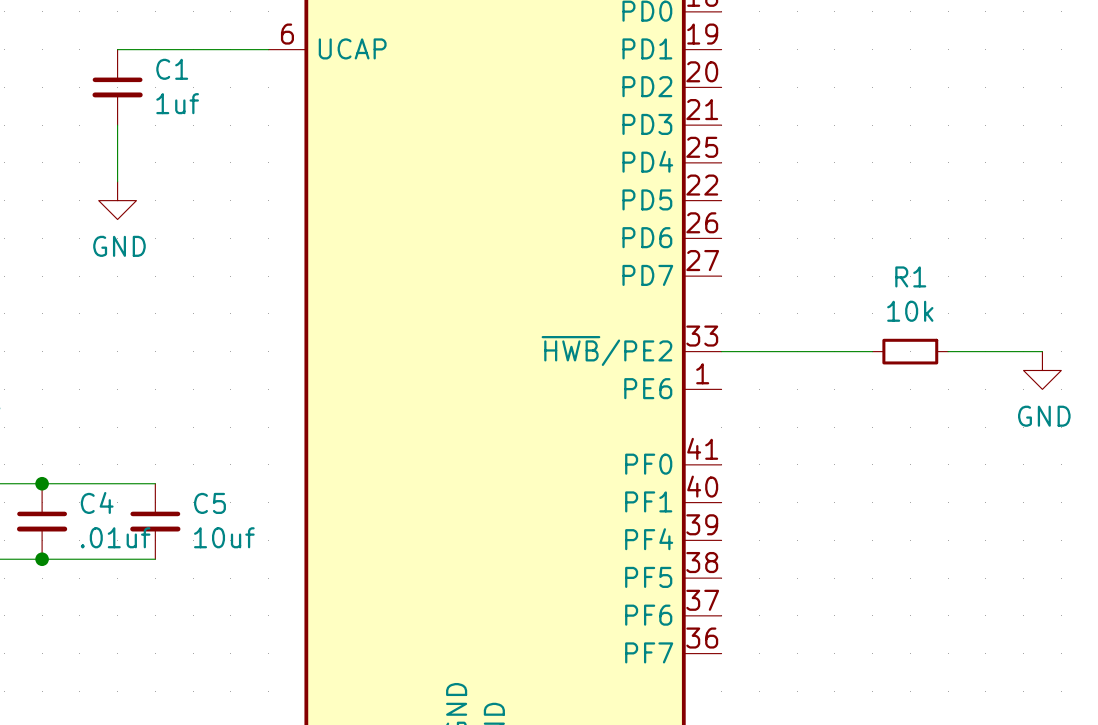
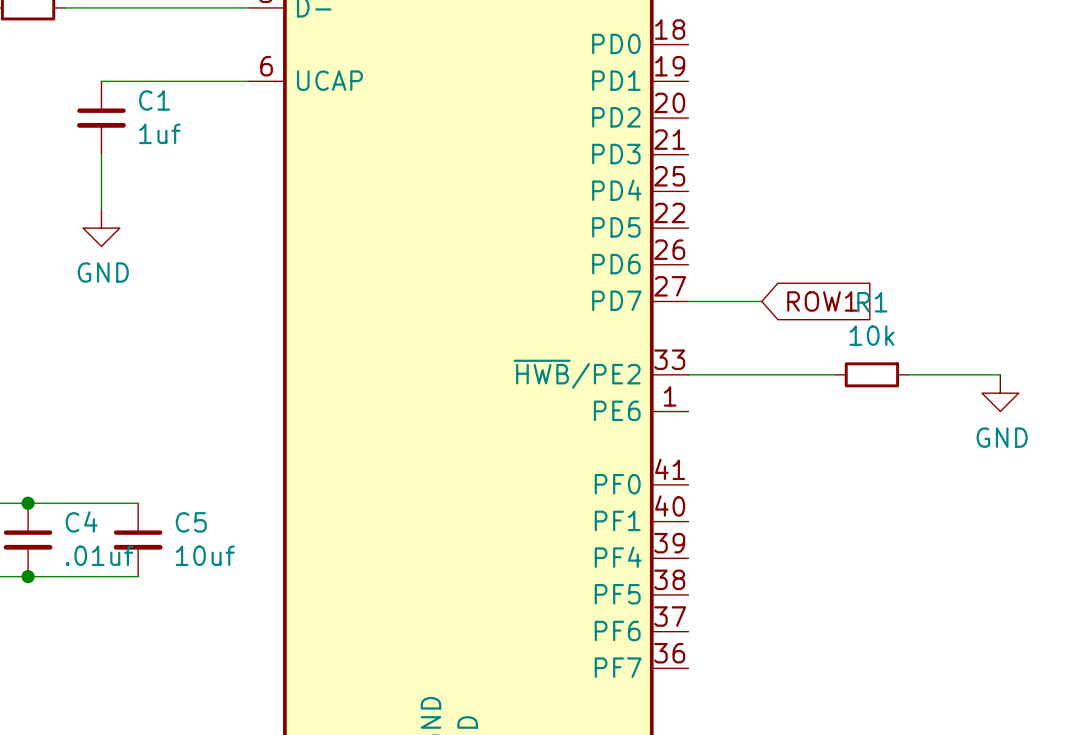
wire: none -> (688, 301) (761, 301)
global label: none -> ROW1 (822, 301)

